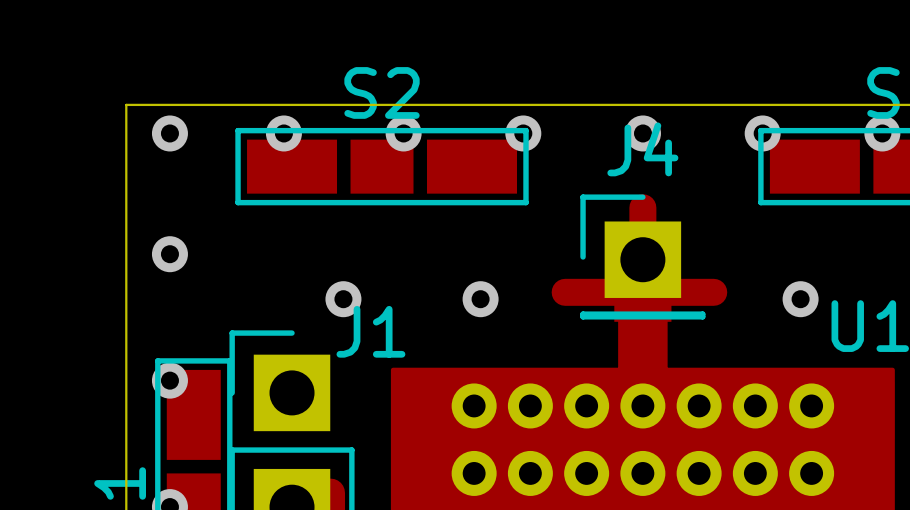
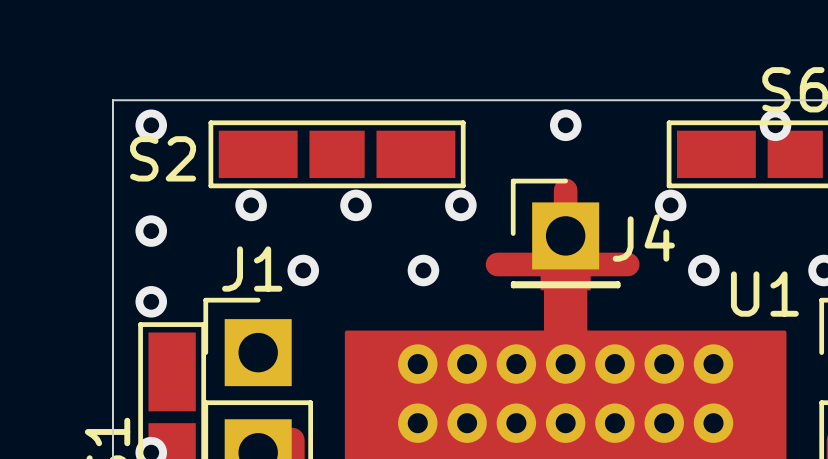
S2 name position: S2 (382, 92) -> S2 (163, 158)
via: (283, 133) -> none
via: (403, 133) -> none
via: (523, 133) -> none
via position: (762, 133) -> (670, 205)
J4 name position: J4 (642, 149) -> J4 (643, 238)
via: none -> (251, 205)
via: none -> (356, 205)
via: none -> (460, 205)
J1 name position: J1 (370, 331) -> J1 (252, 269)
via position: (169, 380) -> (151, 301)

